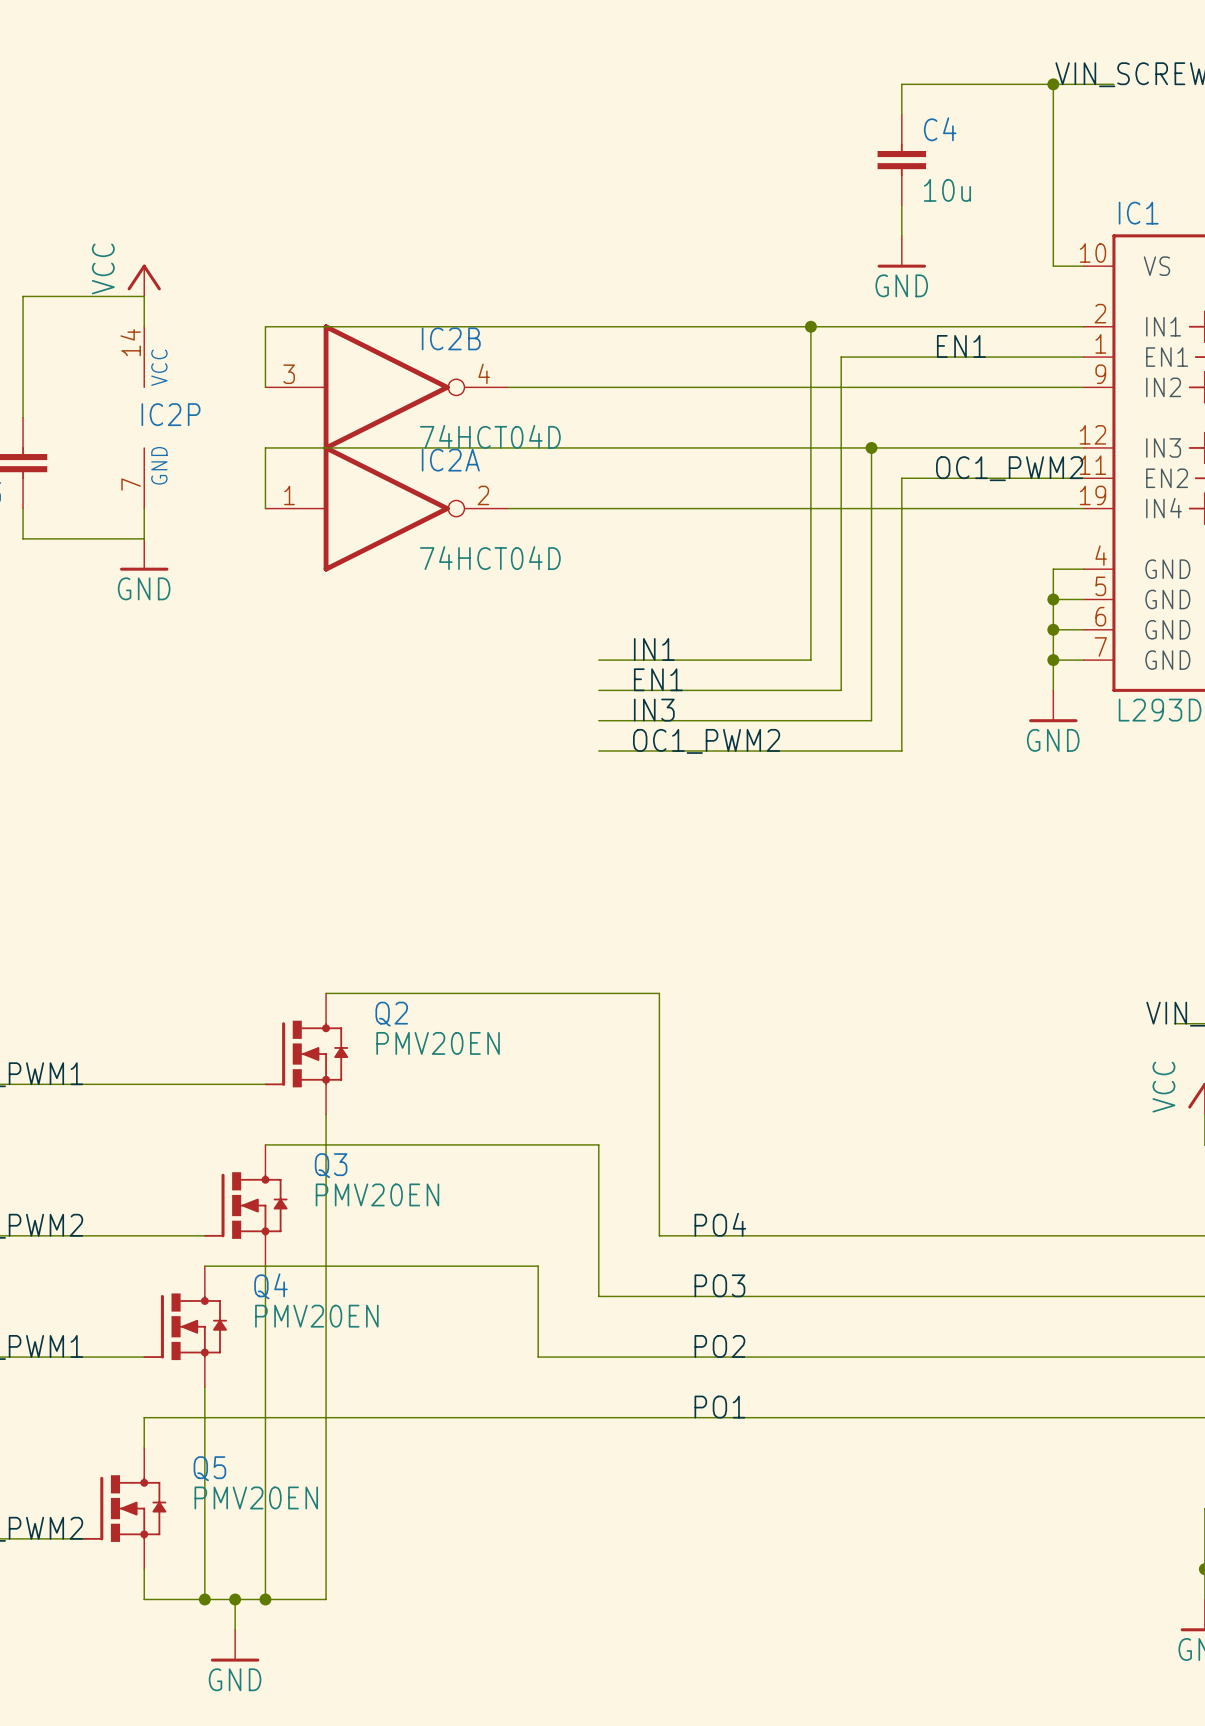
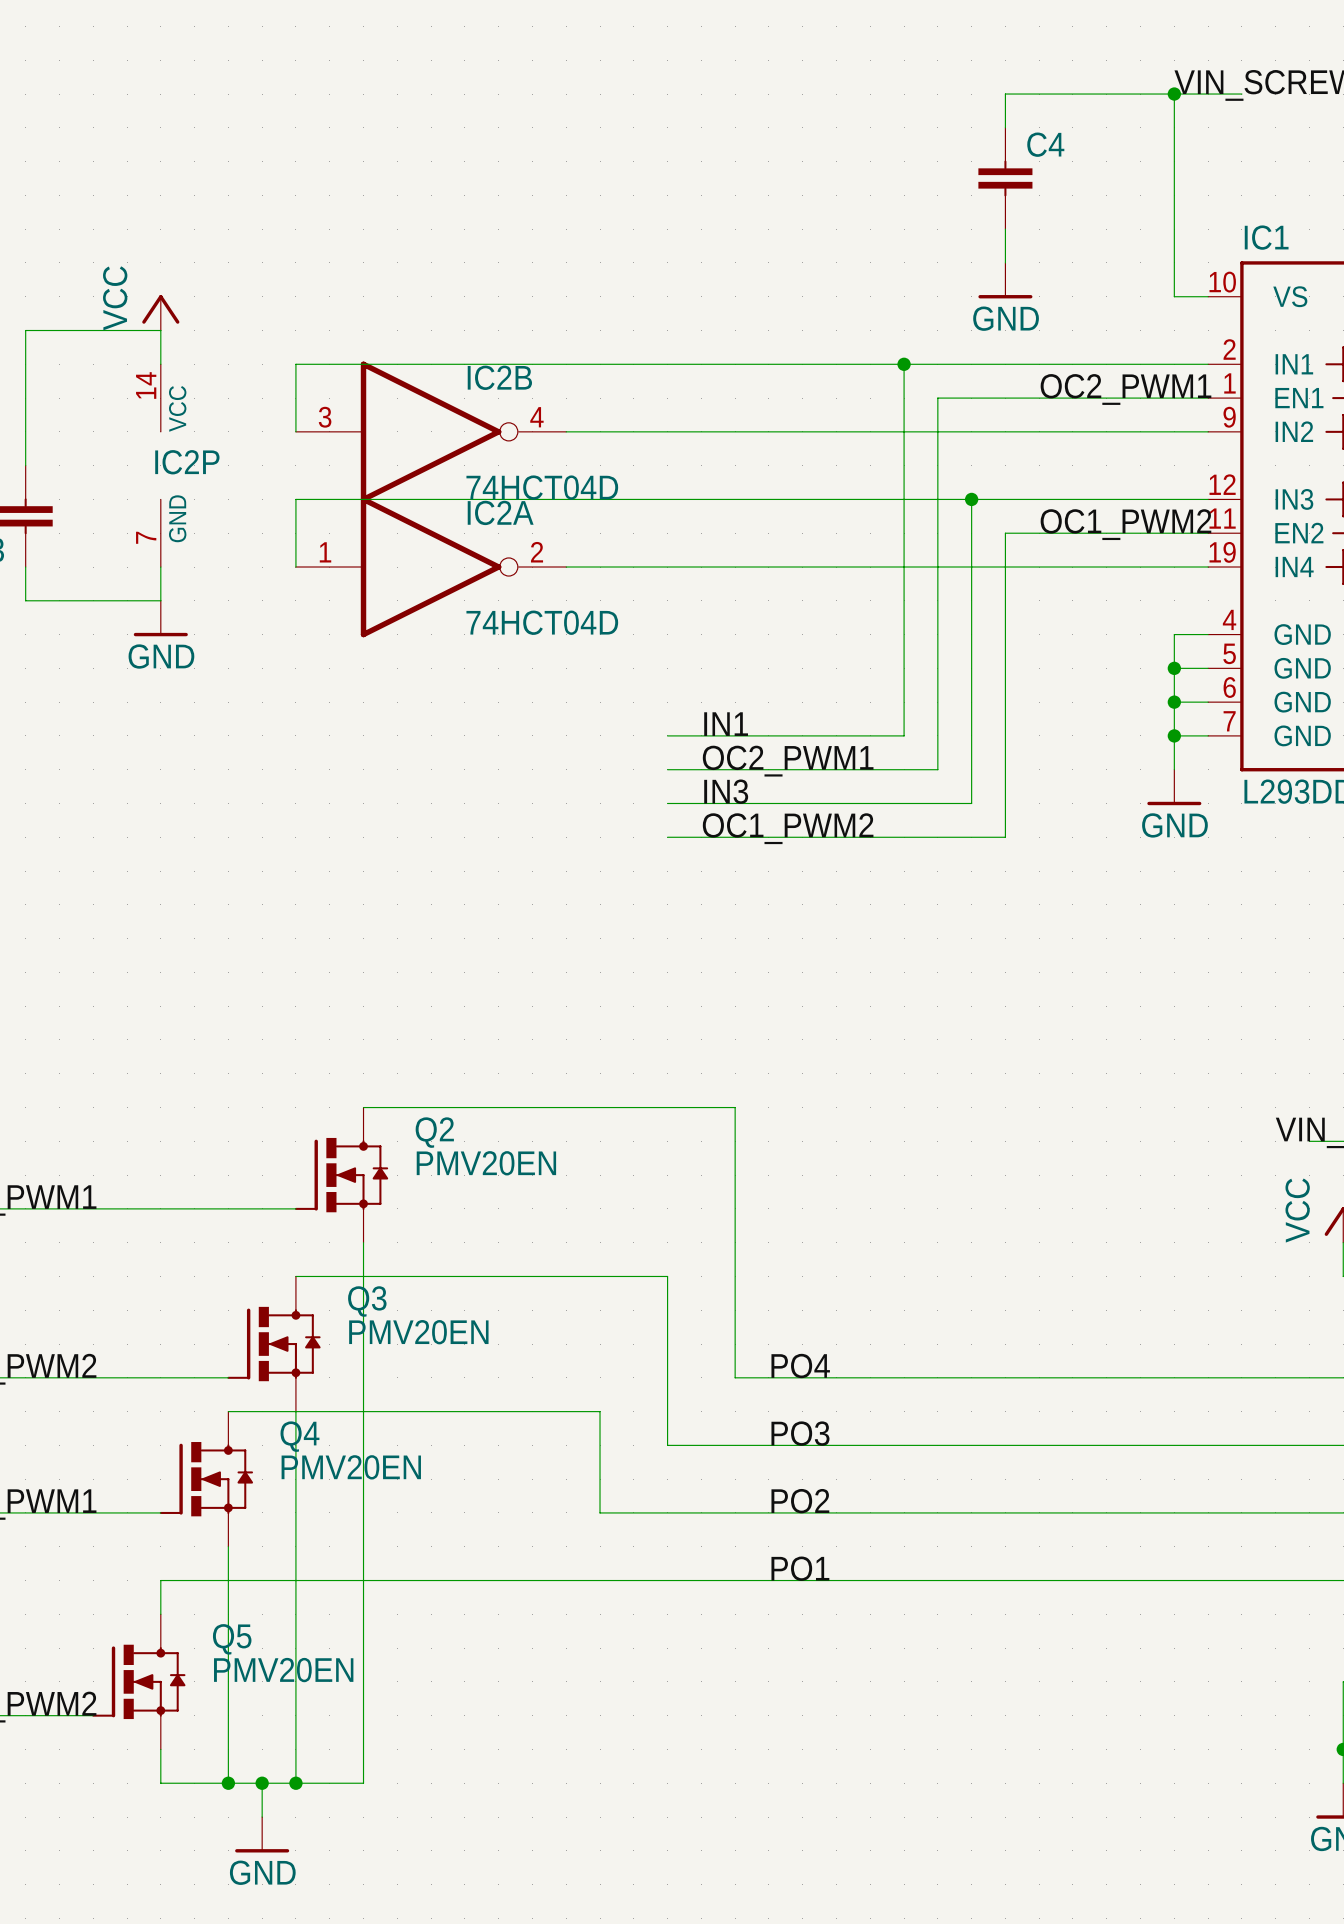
C4 value: 10u (947, 190) -> none
label: EN1 (961, 346) -> OC2_PWM1 (1125, 389)
label: EN1 (658, 679) -> OC2_PWM1 (788, 761)

